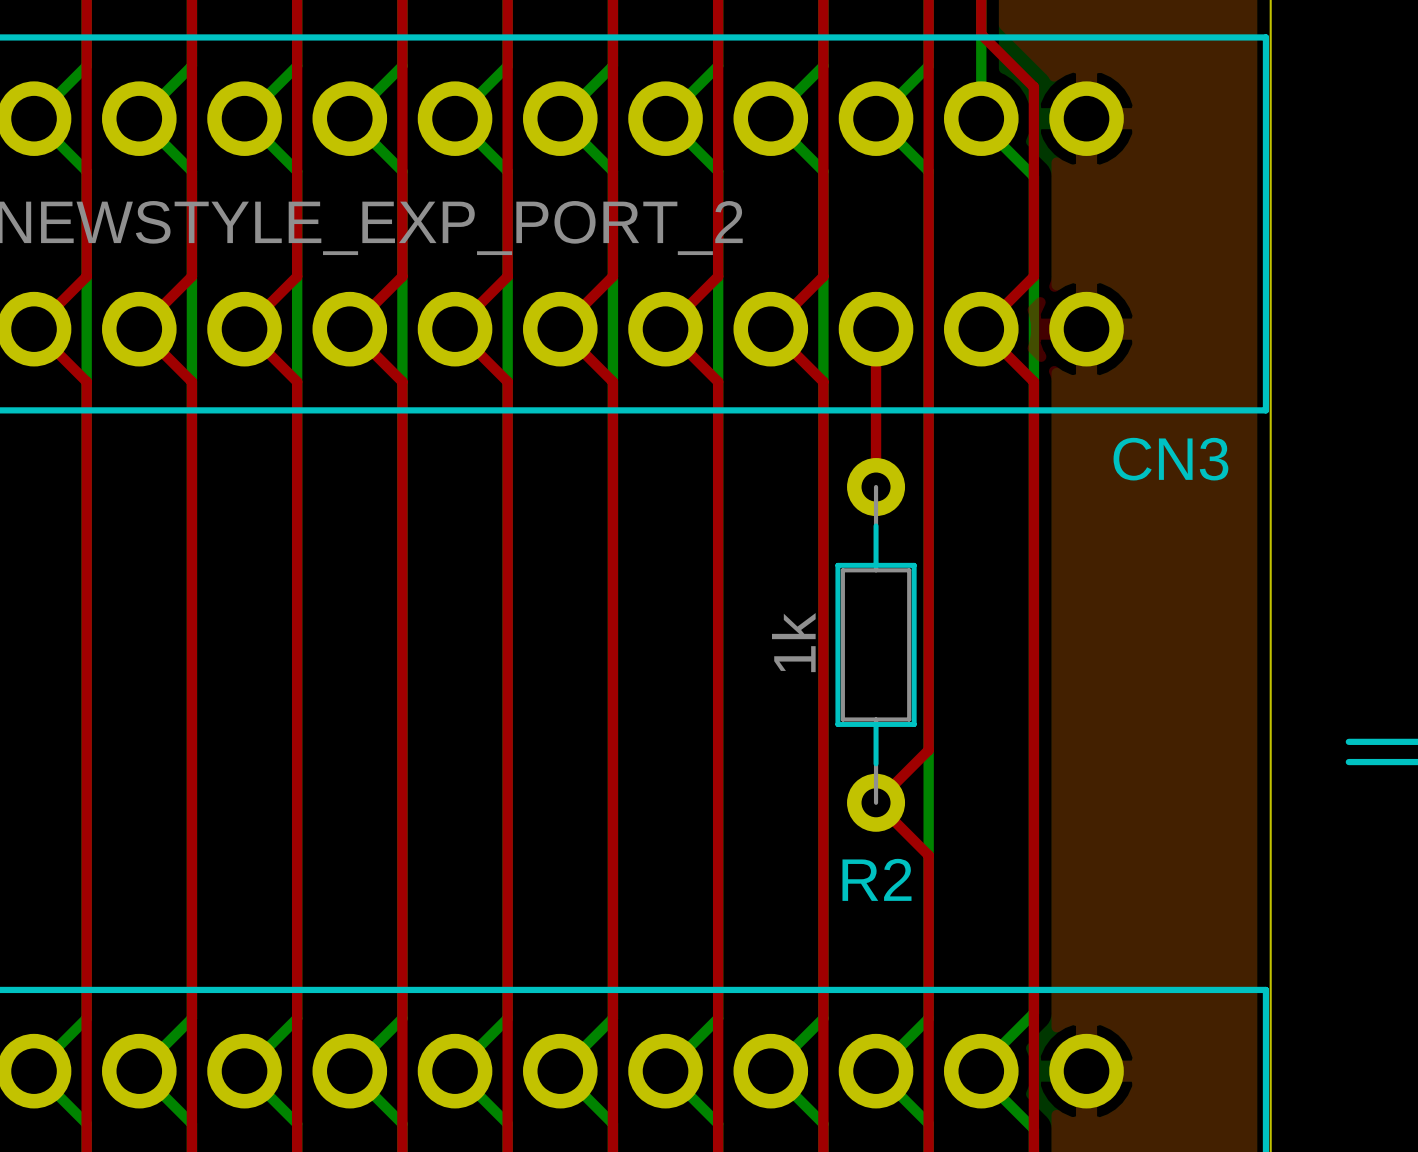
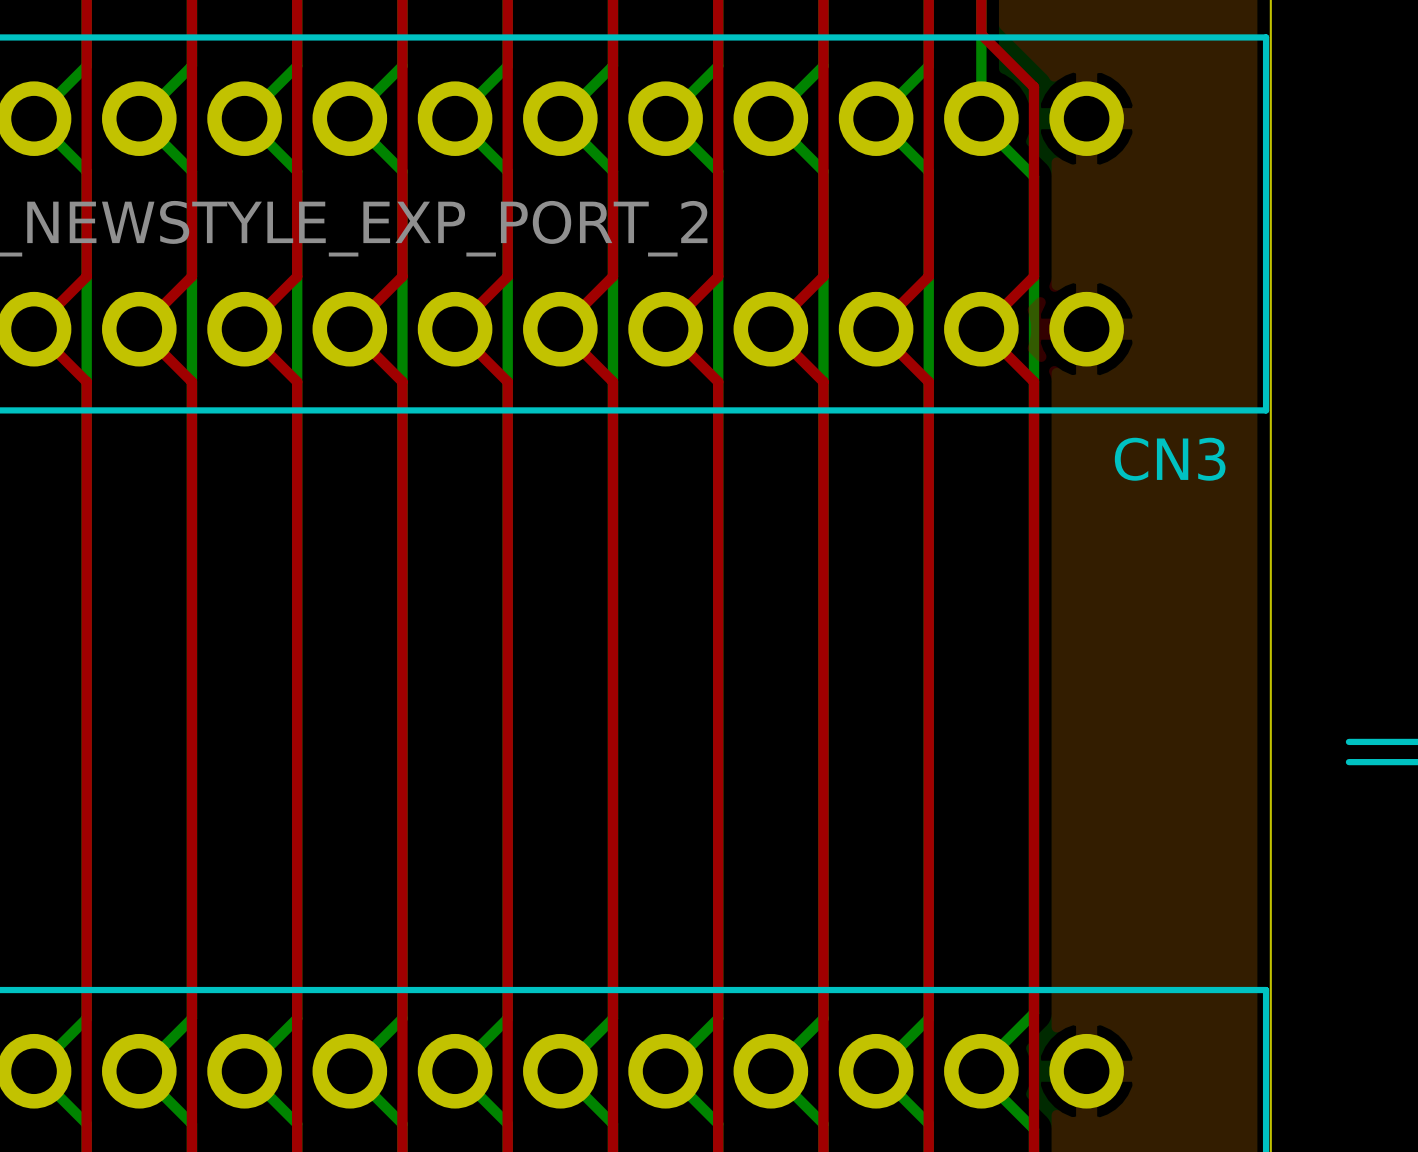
top track: (928, 276) (928, 381) -> (928, 276) (876, 329) (928, 381)
top track: (876, 329) (876, 487) -> none
R2: 1k (876, 644) -> none
top track: (928, 750) (876, 802) (928, 855) -> (928, 750) (928, 855)

